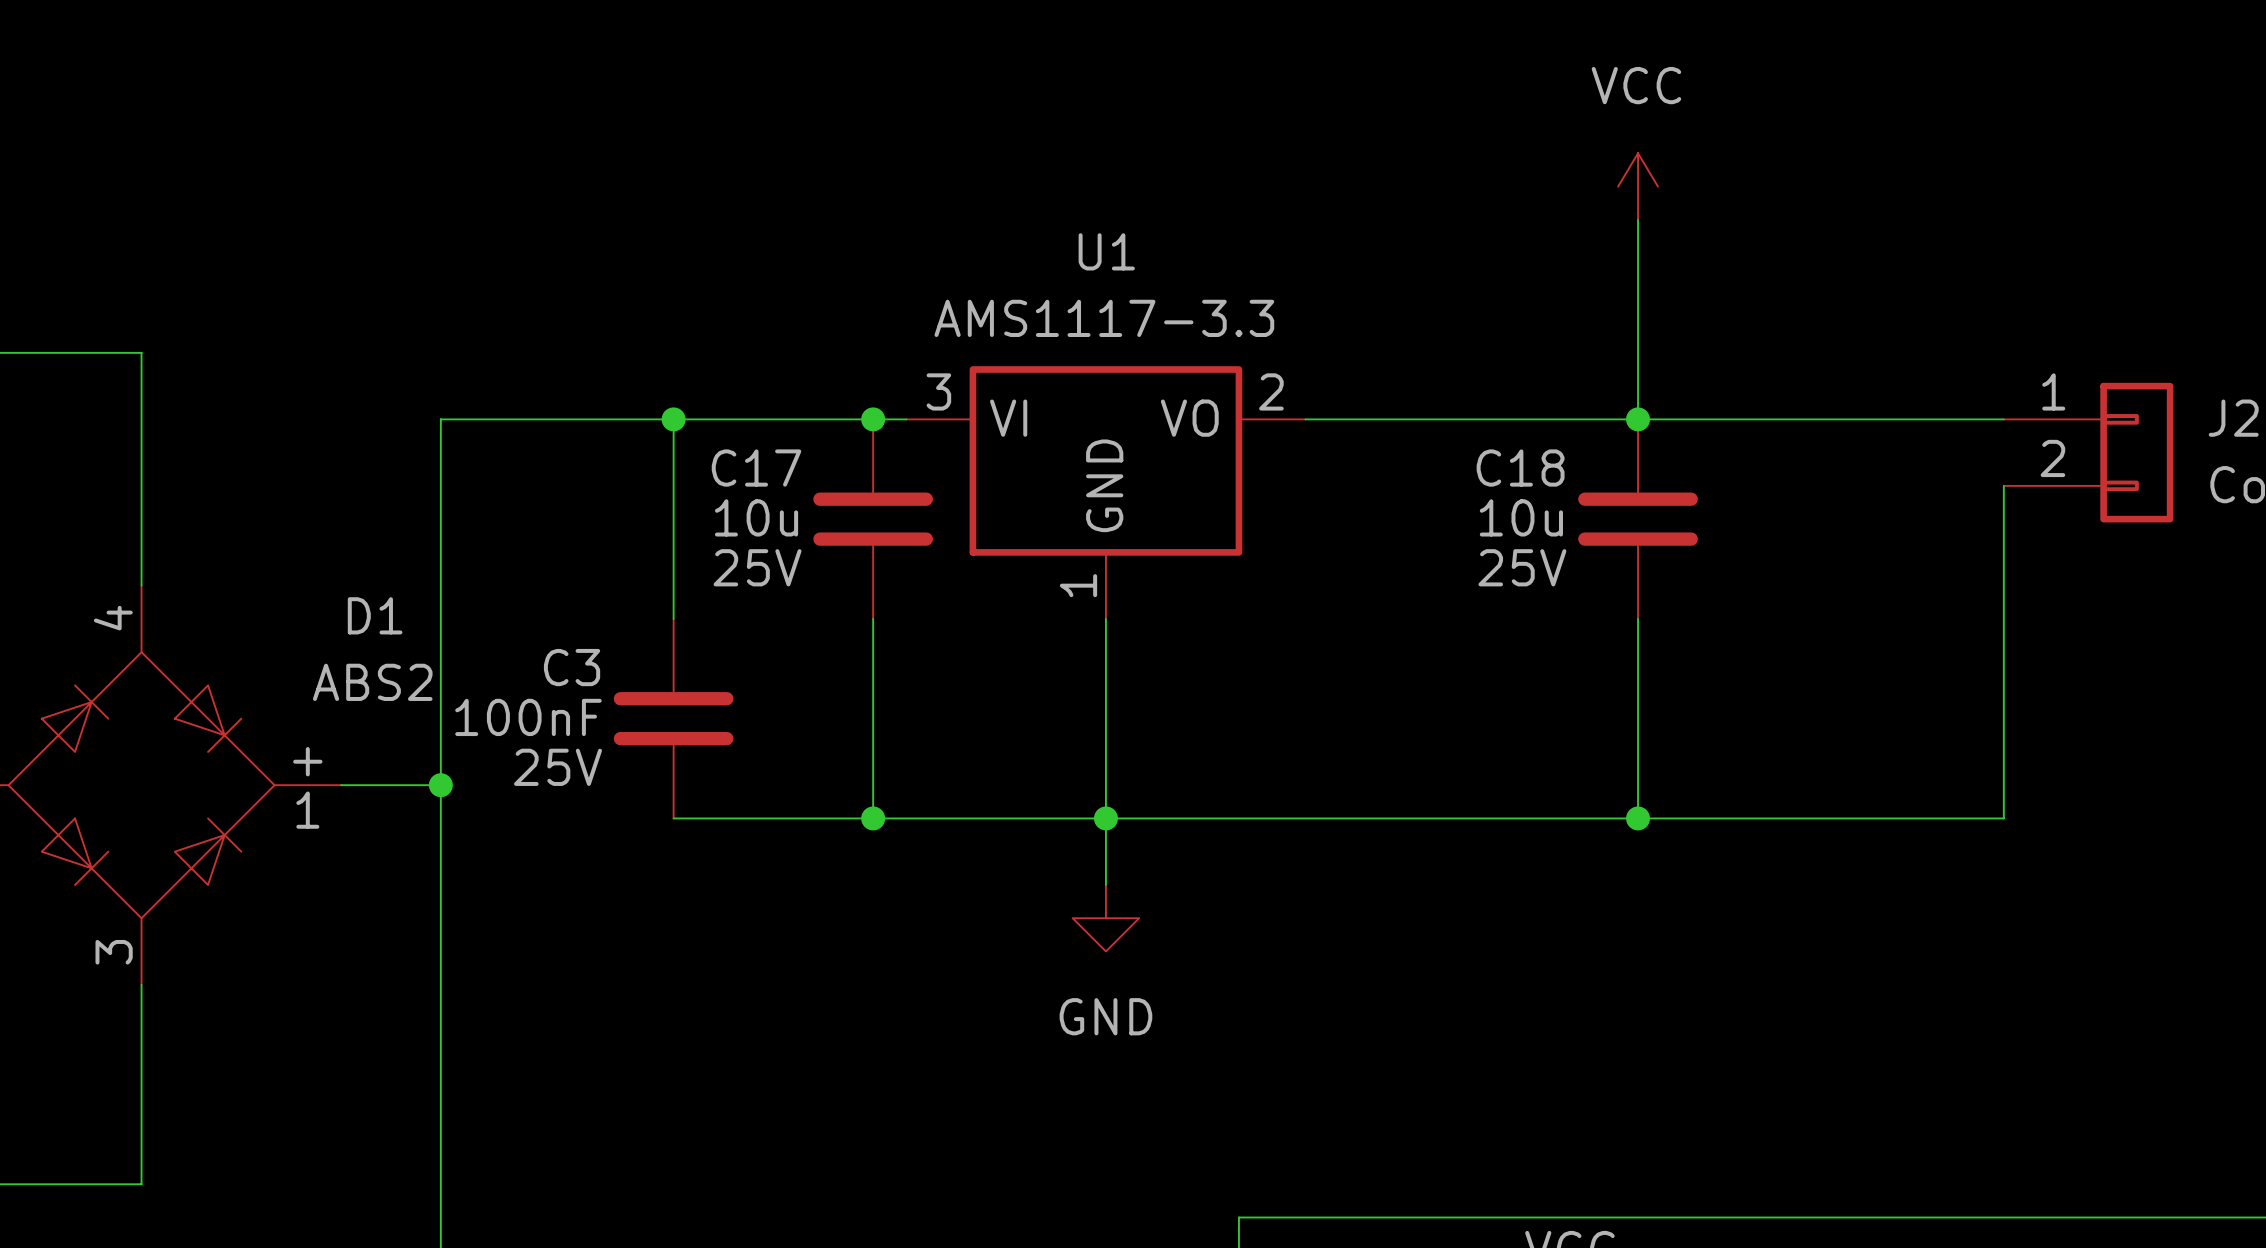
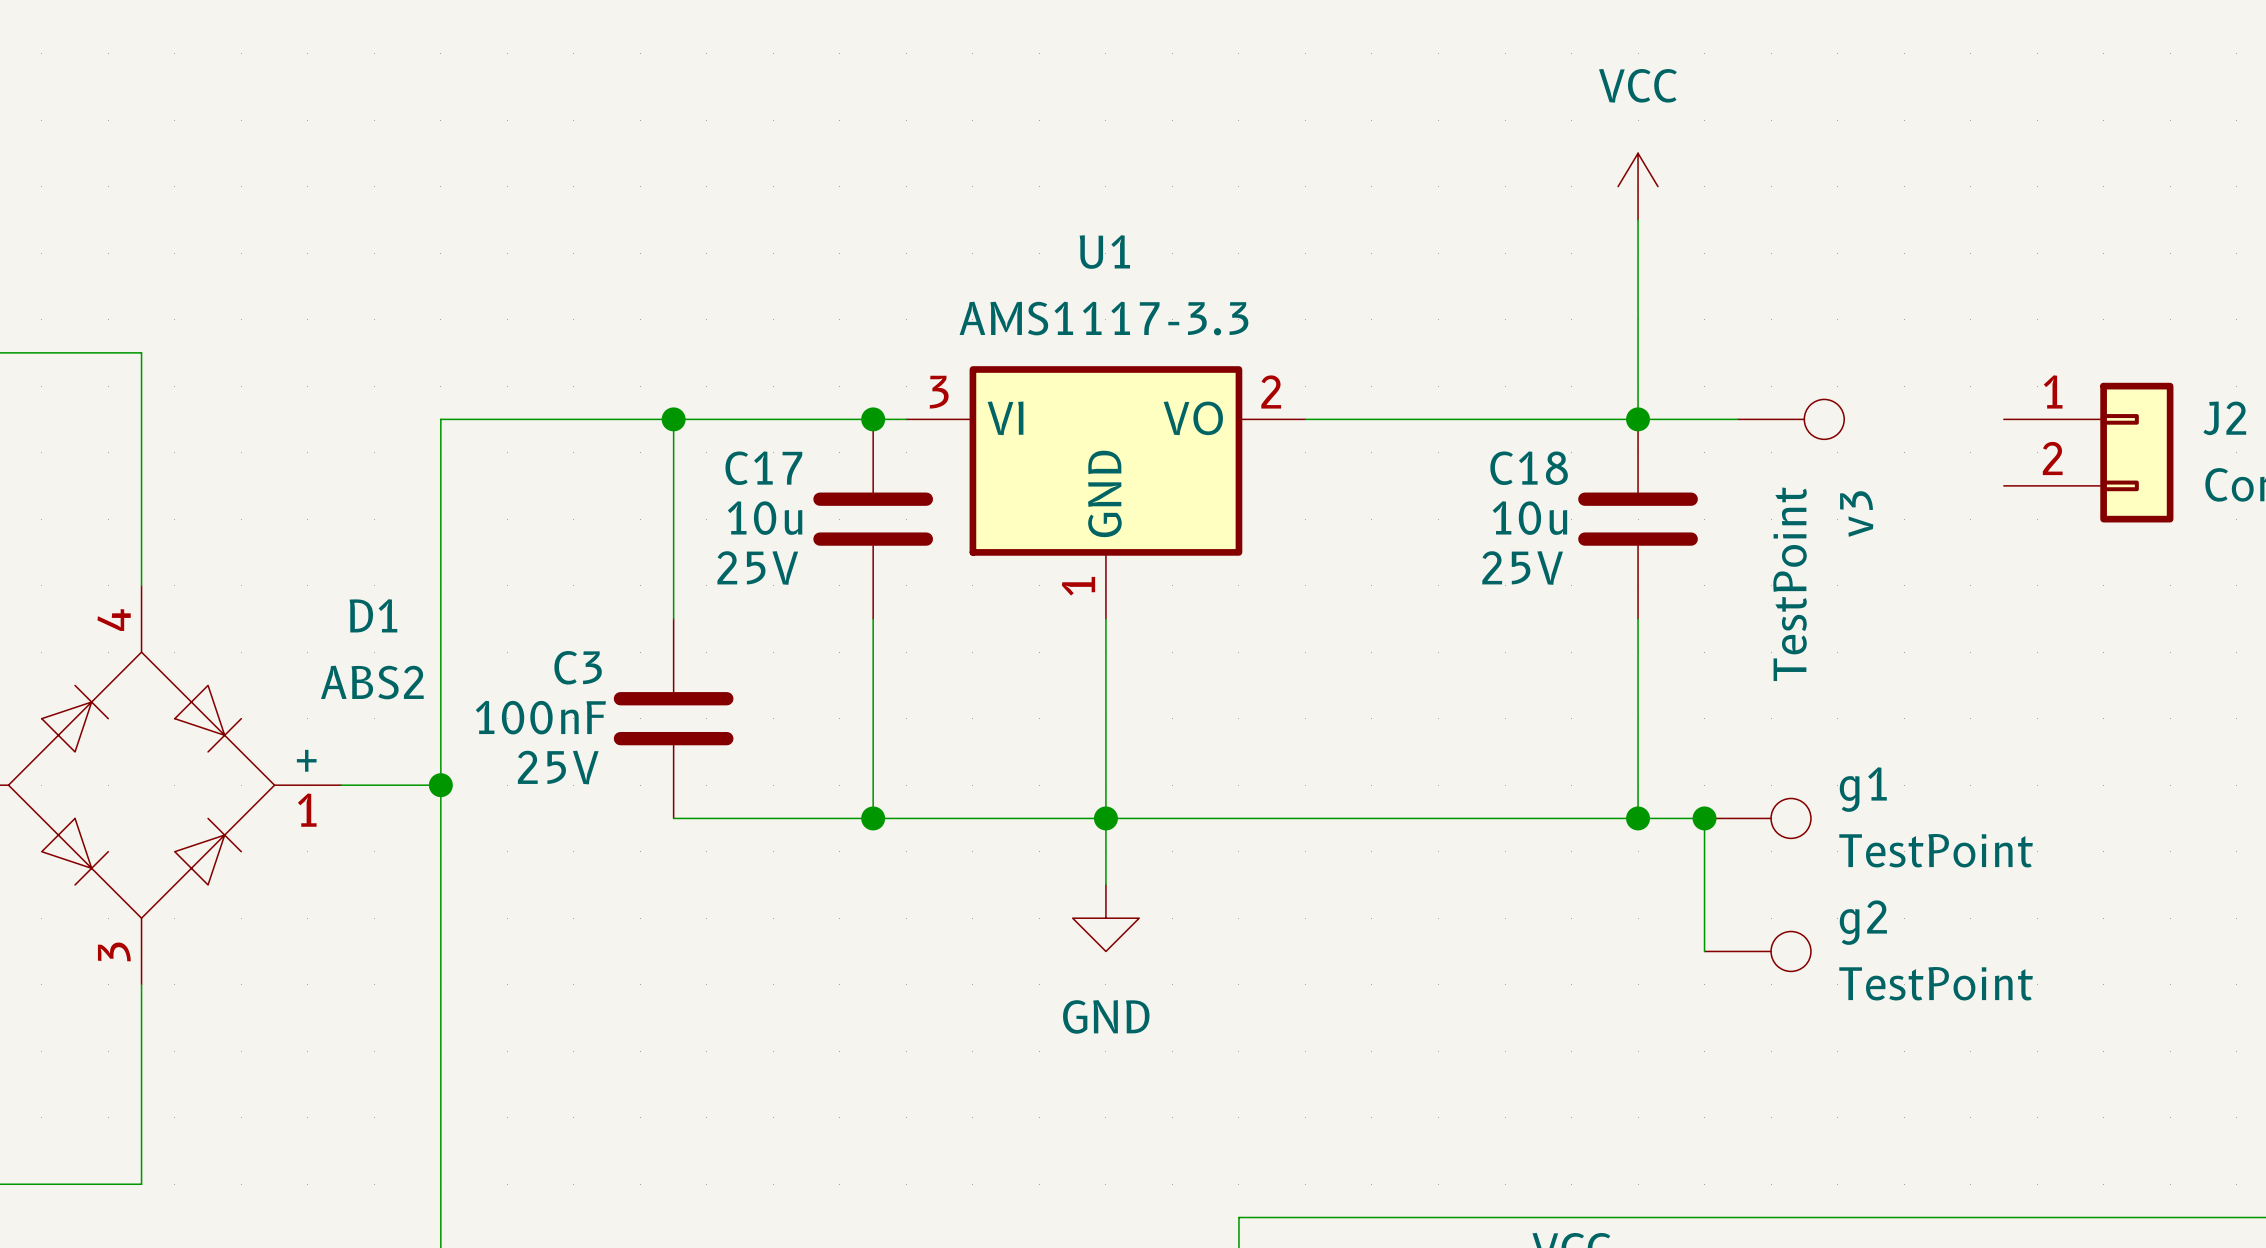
wire: (1737, 419) (2003, 419) -> none
v3: none -> TestPoint (1791, 419)
wire: (2003, 485) (2003, 818) (1704, 818) -> (1704, 951) (1704, 818)
junction: none -> (1704, 818)
g1: none -> TestPoint (1757, 818)
g2: none -> TestPoint (1757, 951)

